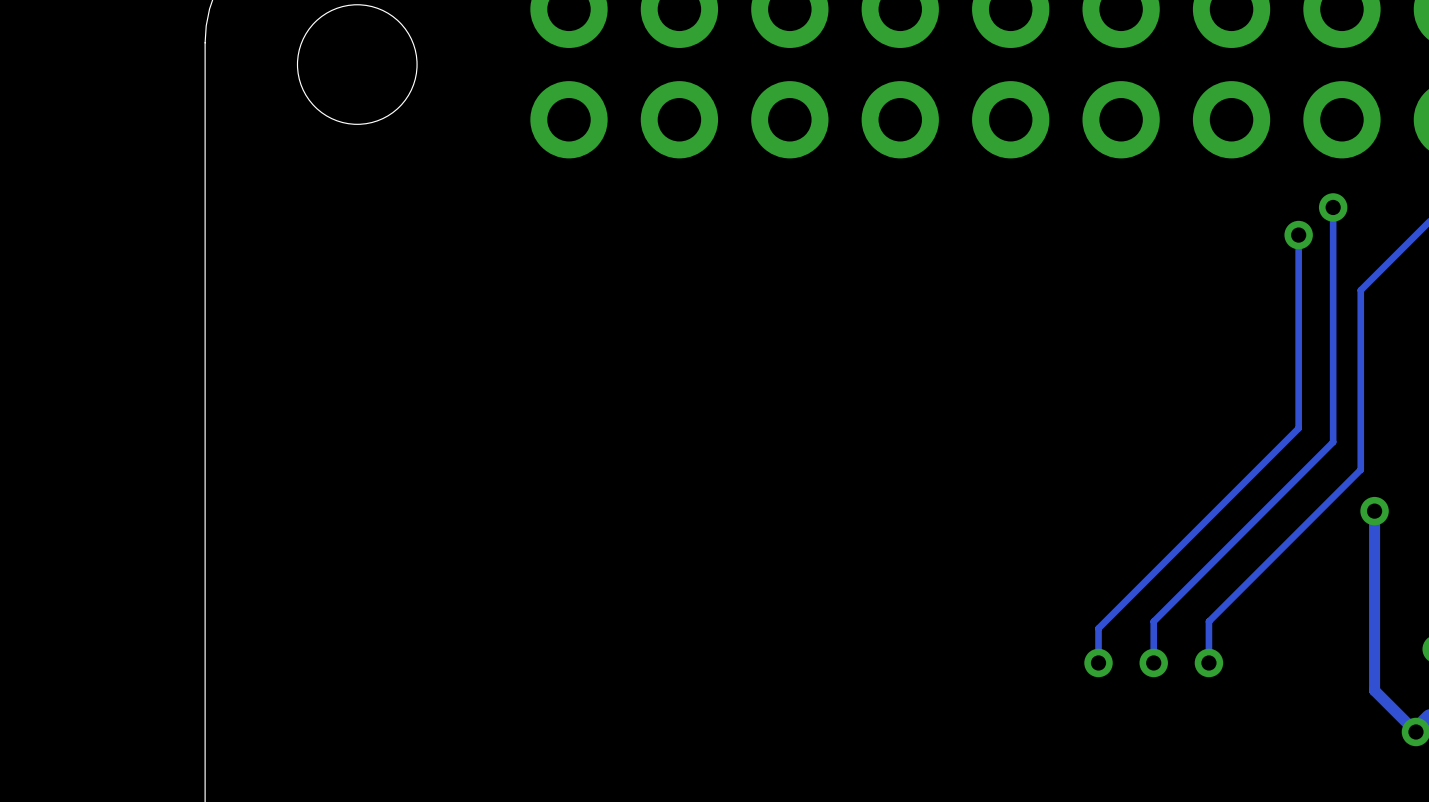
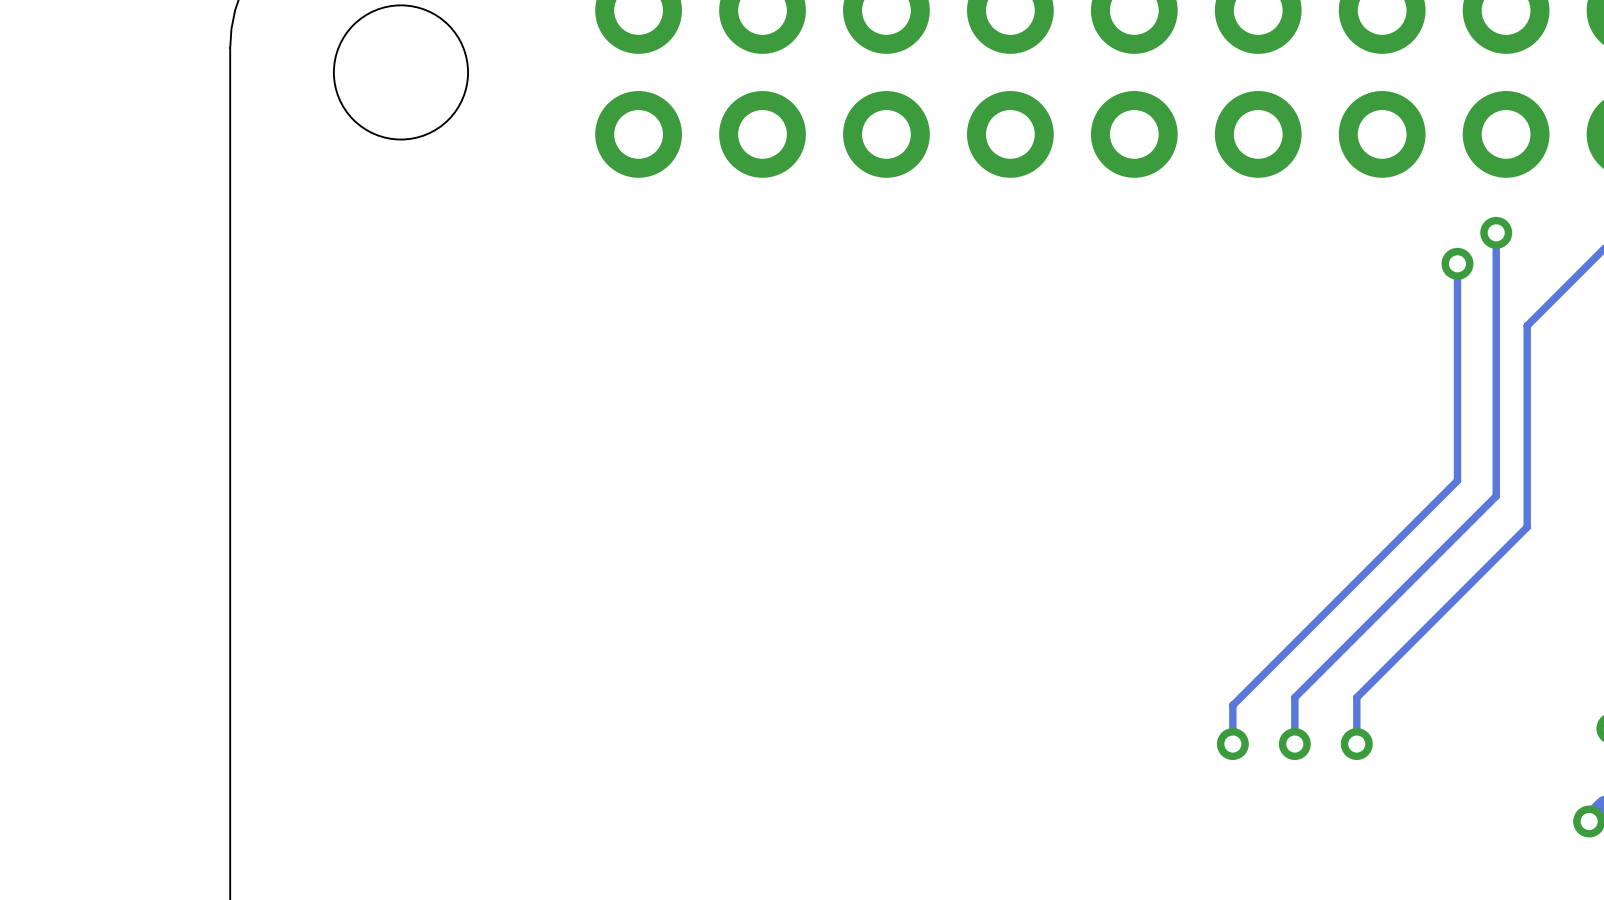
track: (1374, 511) (1374, 690) (1415, 731) -> none
via: (1374, 511) -> none

